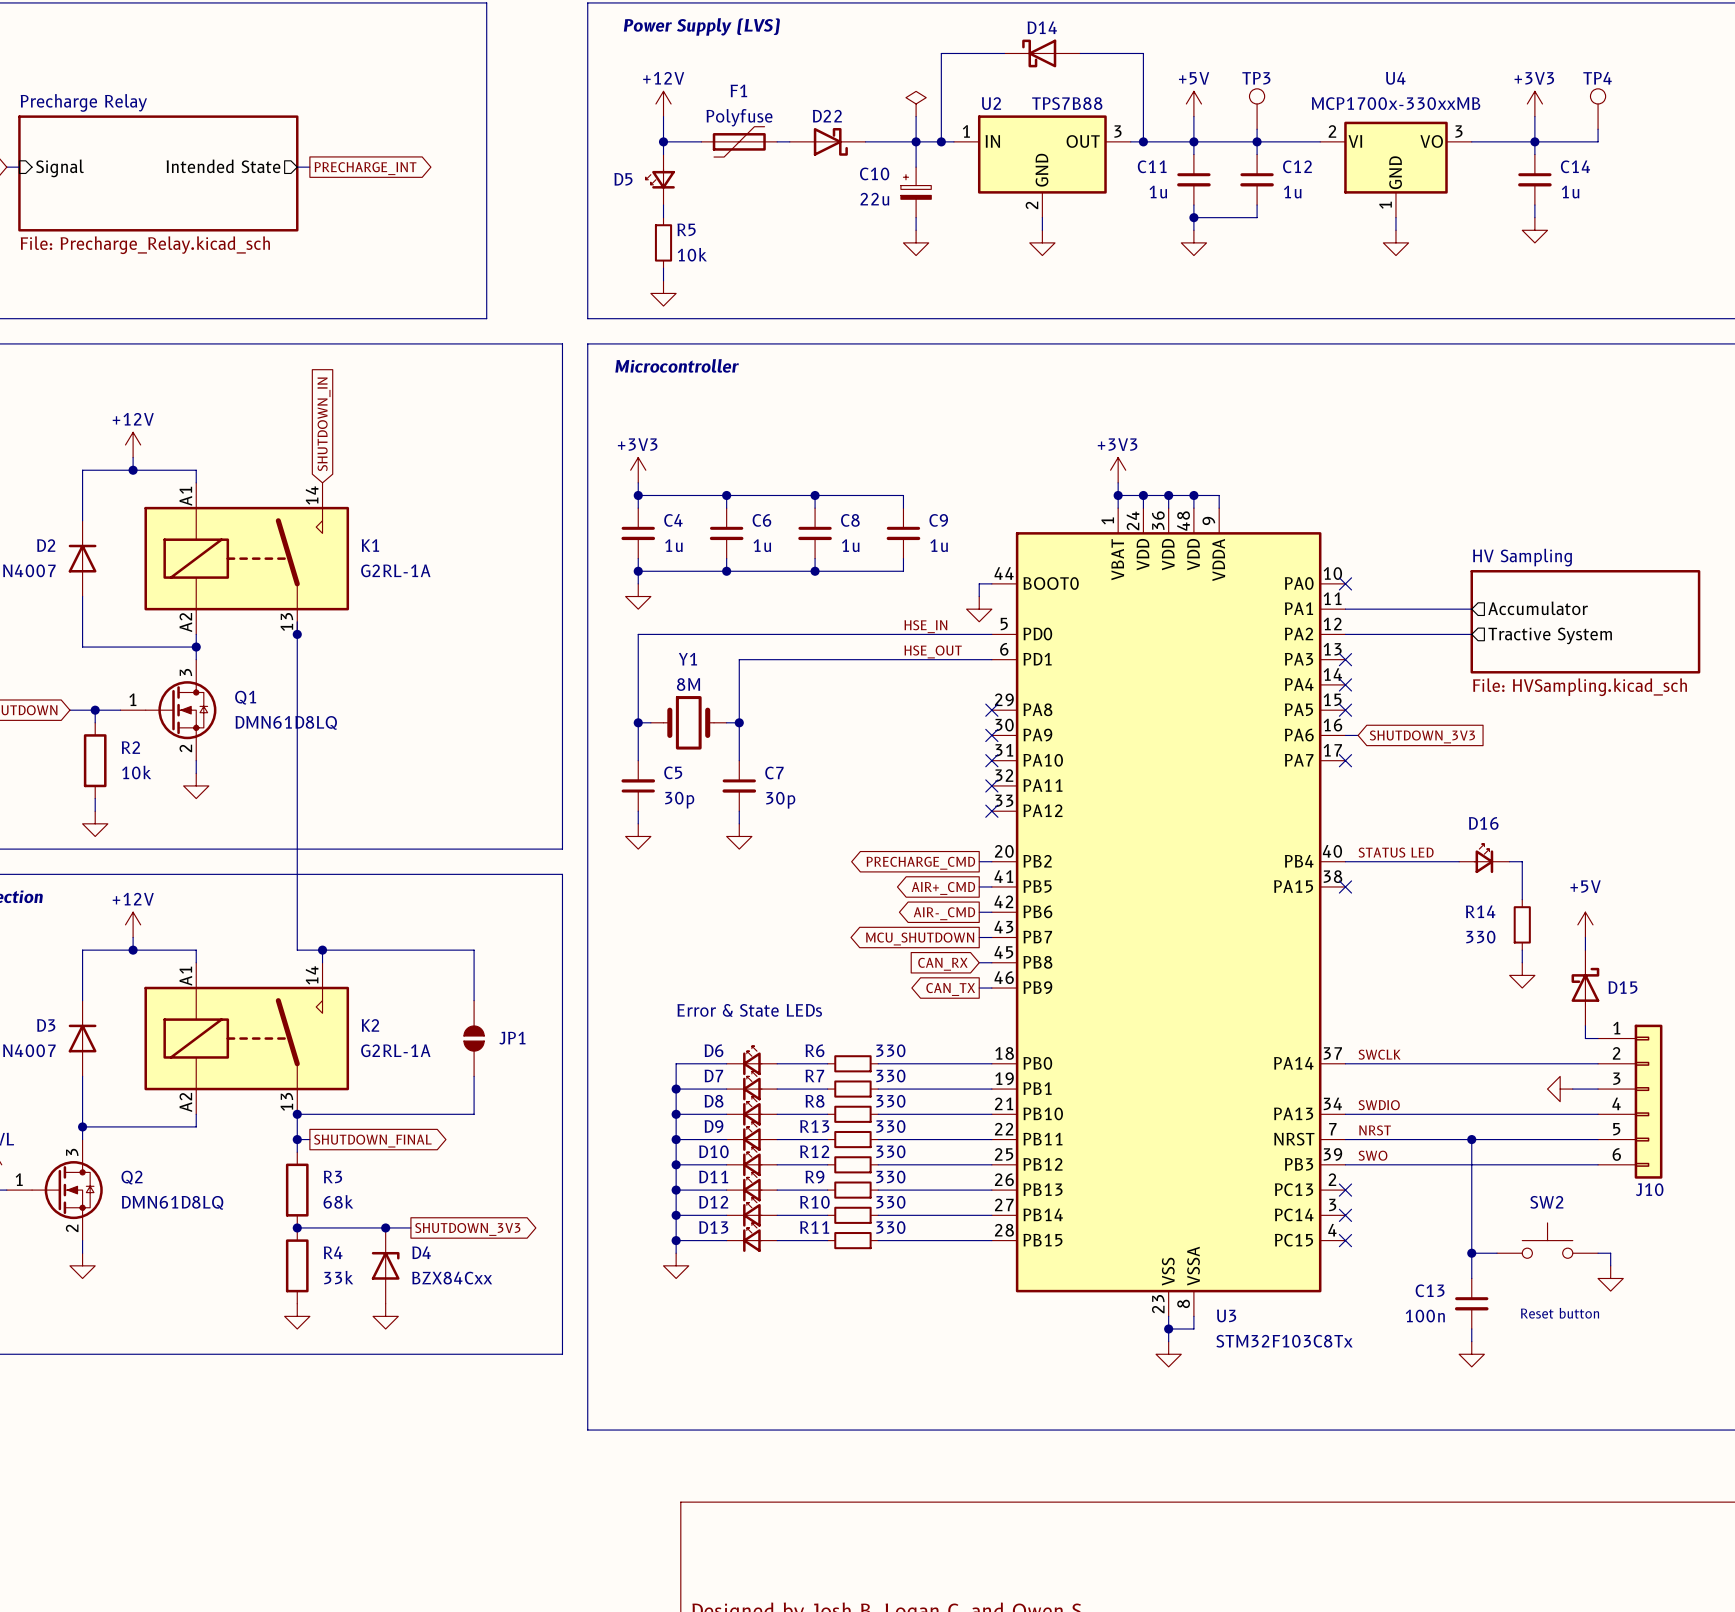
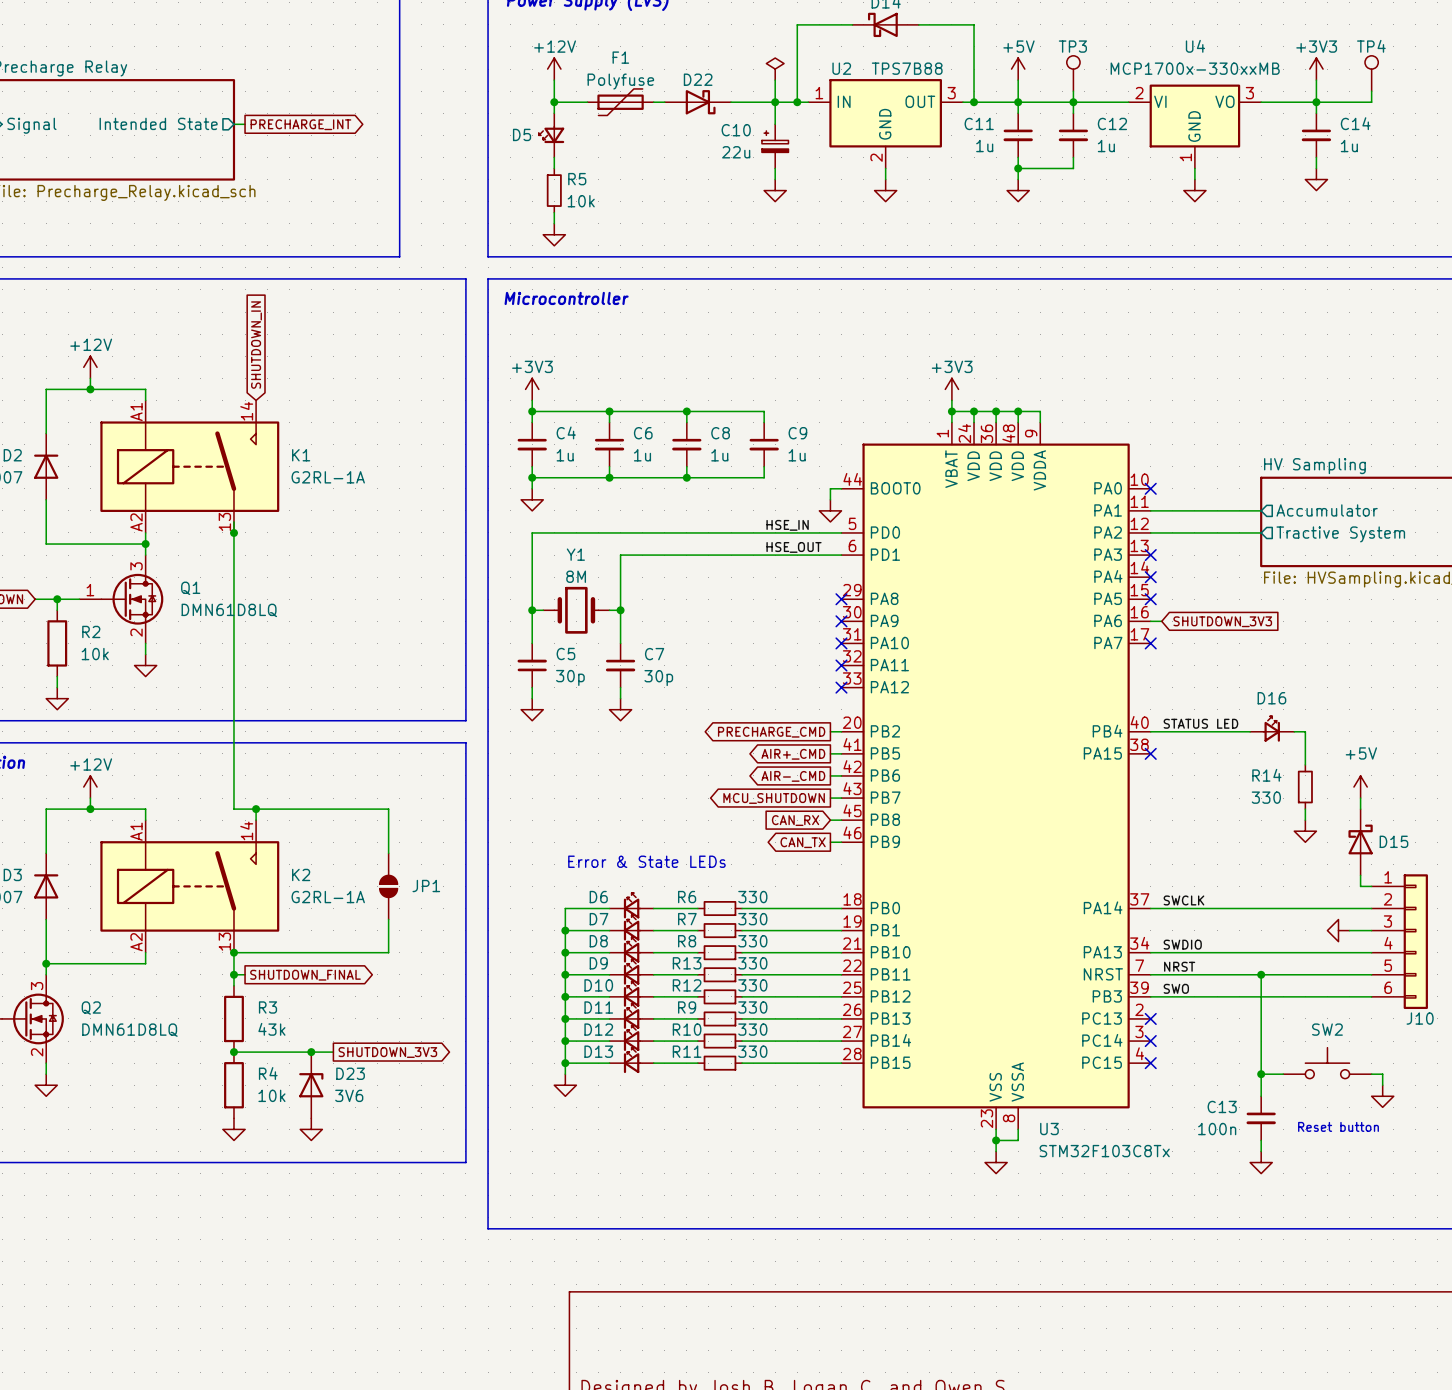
R3 value: 68k (338, 1201) -> 43k (271, 1029)
D4 name: D4 (421, 1252) -> D23 (350, 1073)
R4 value: 33k (338, 1277) -> 10k (271, 1095)
D4 value: BZX84Cxx (452, 1278) -> 3V6 (349, 1095)

